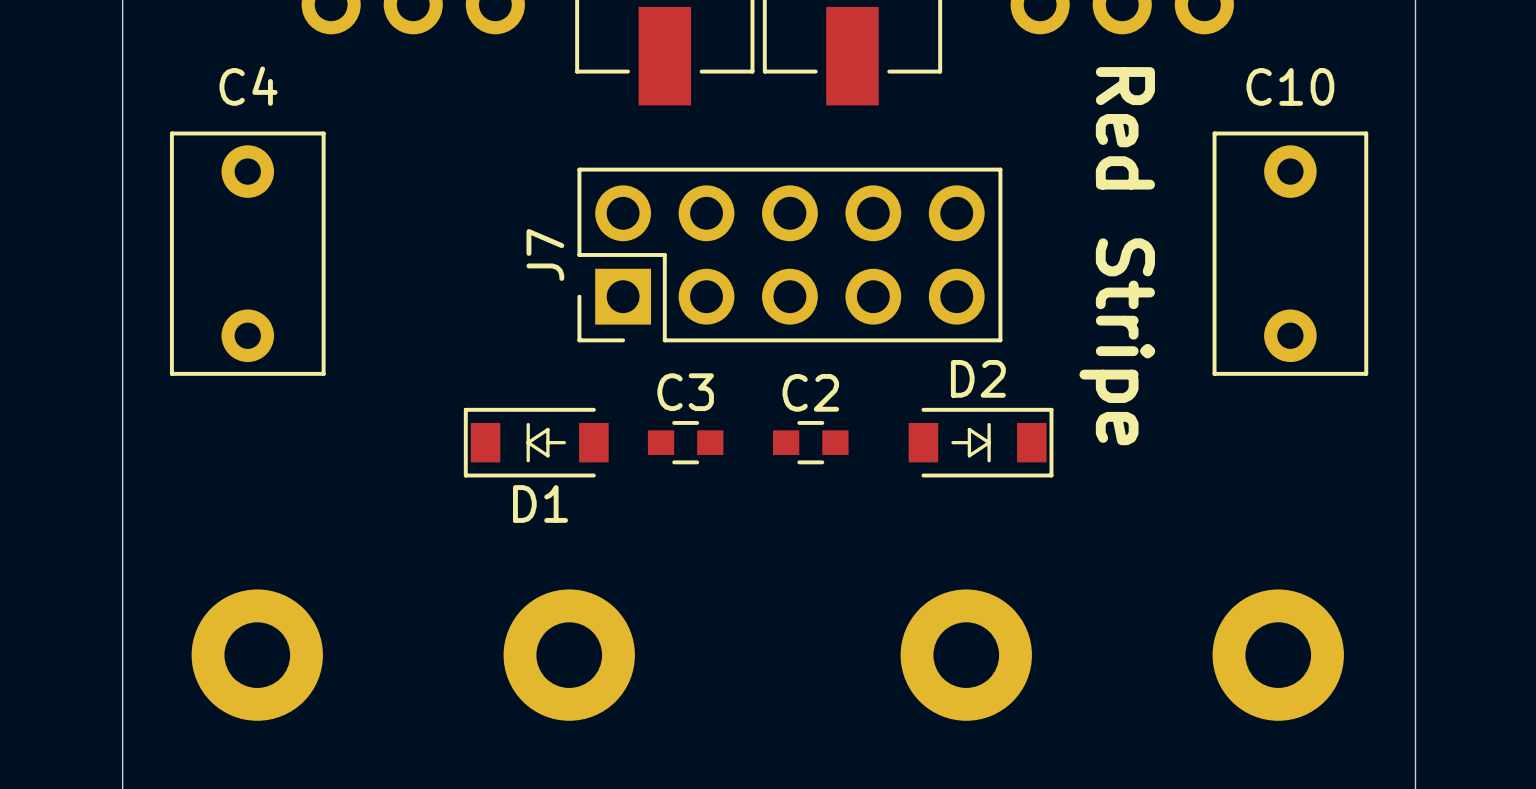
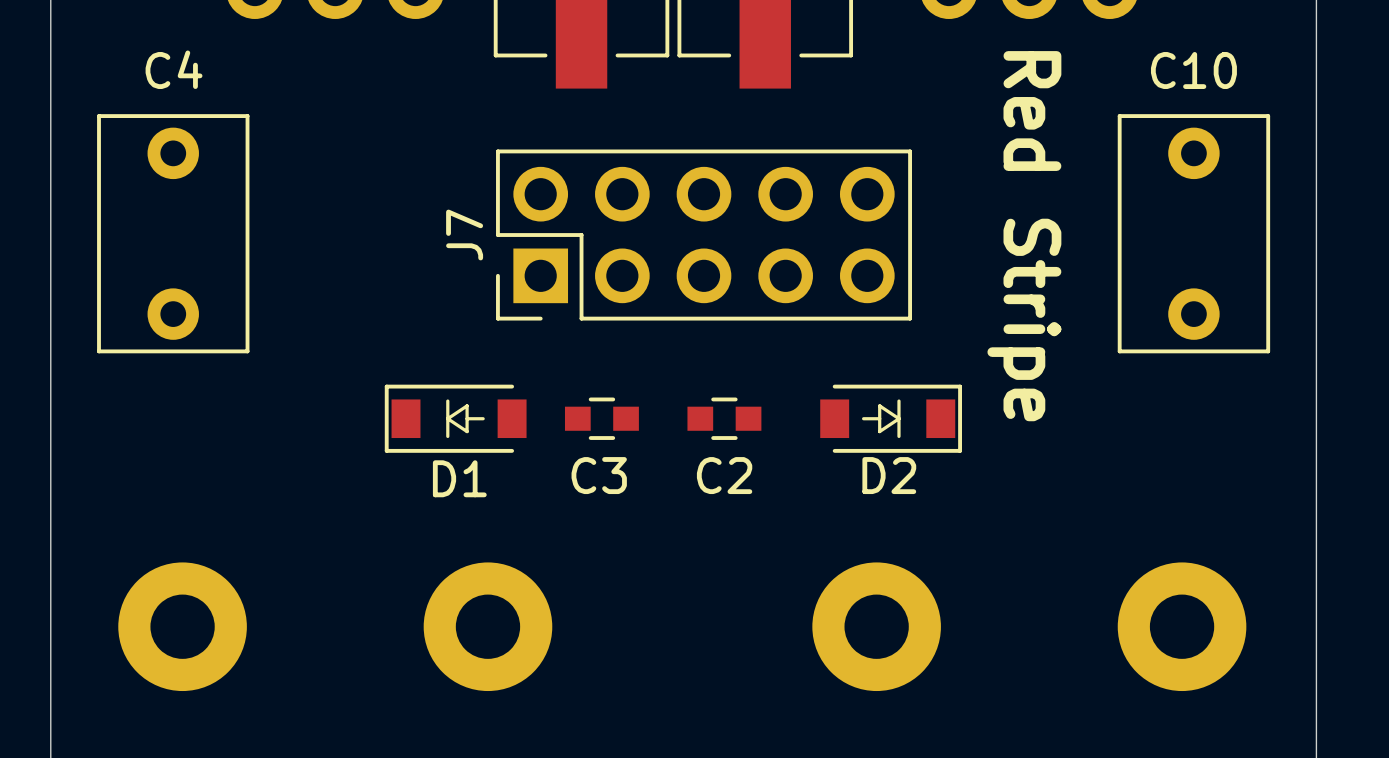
D2 name position: D2 (978, 378) -> D2 (889, 475)
C3 name position: C3 (685, 392) -> C3 (599, 475)
C2 name position: C2 (810, 392) -> C2 (724, 475)

